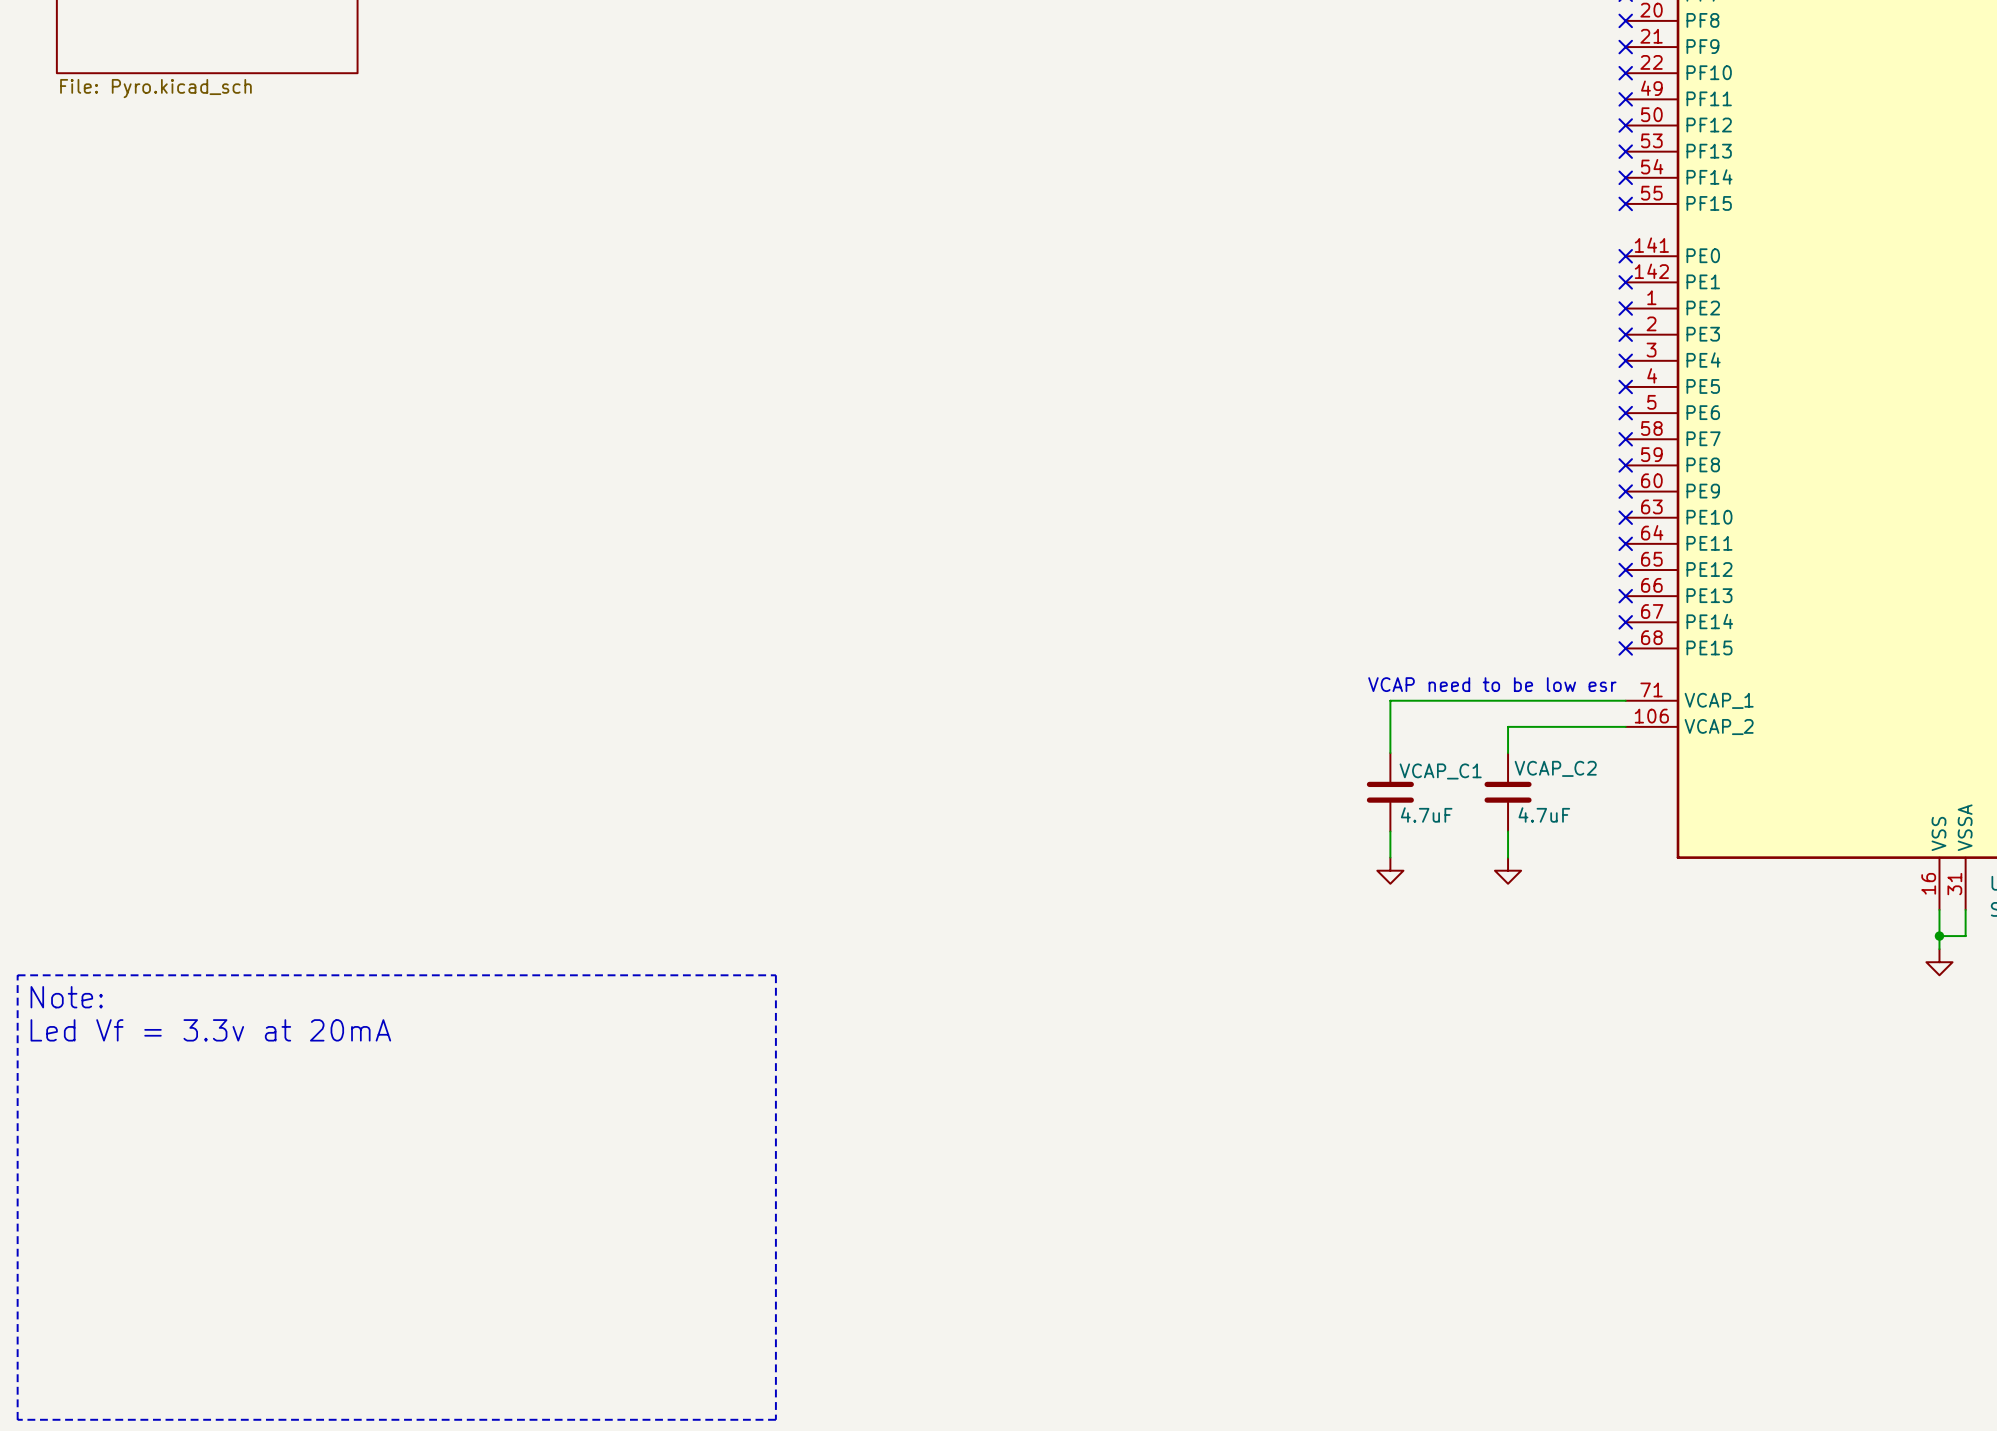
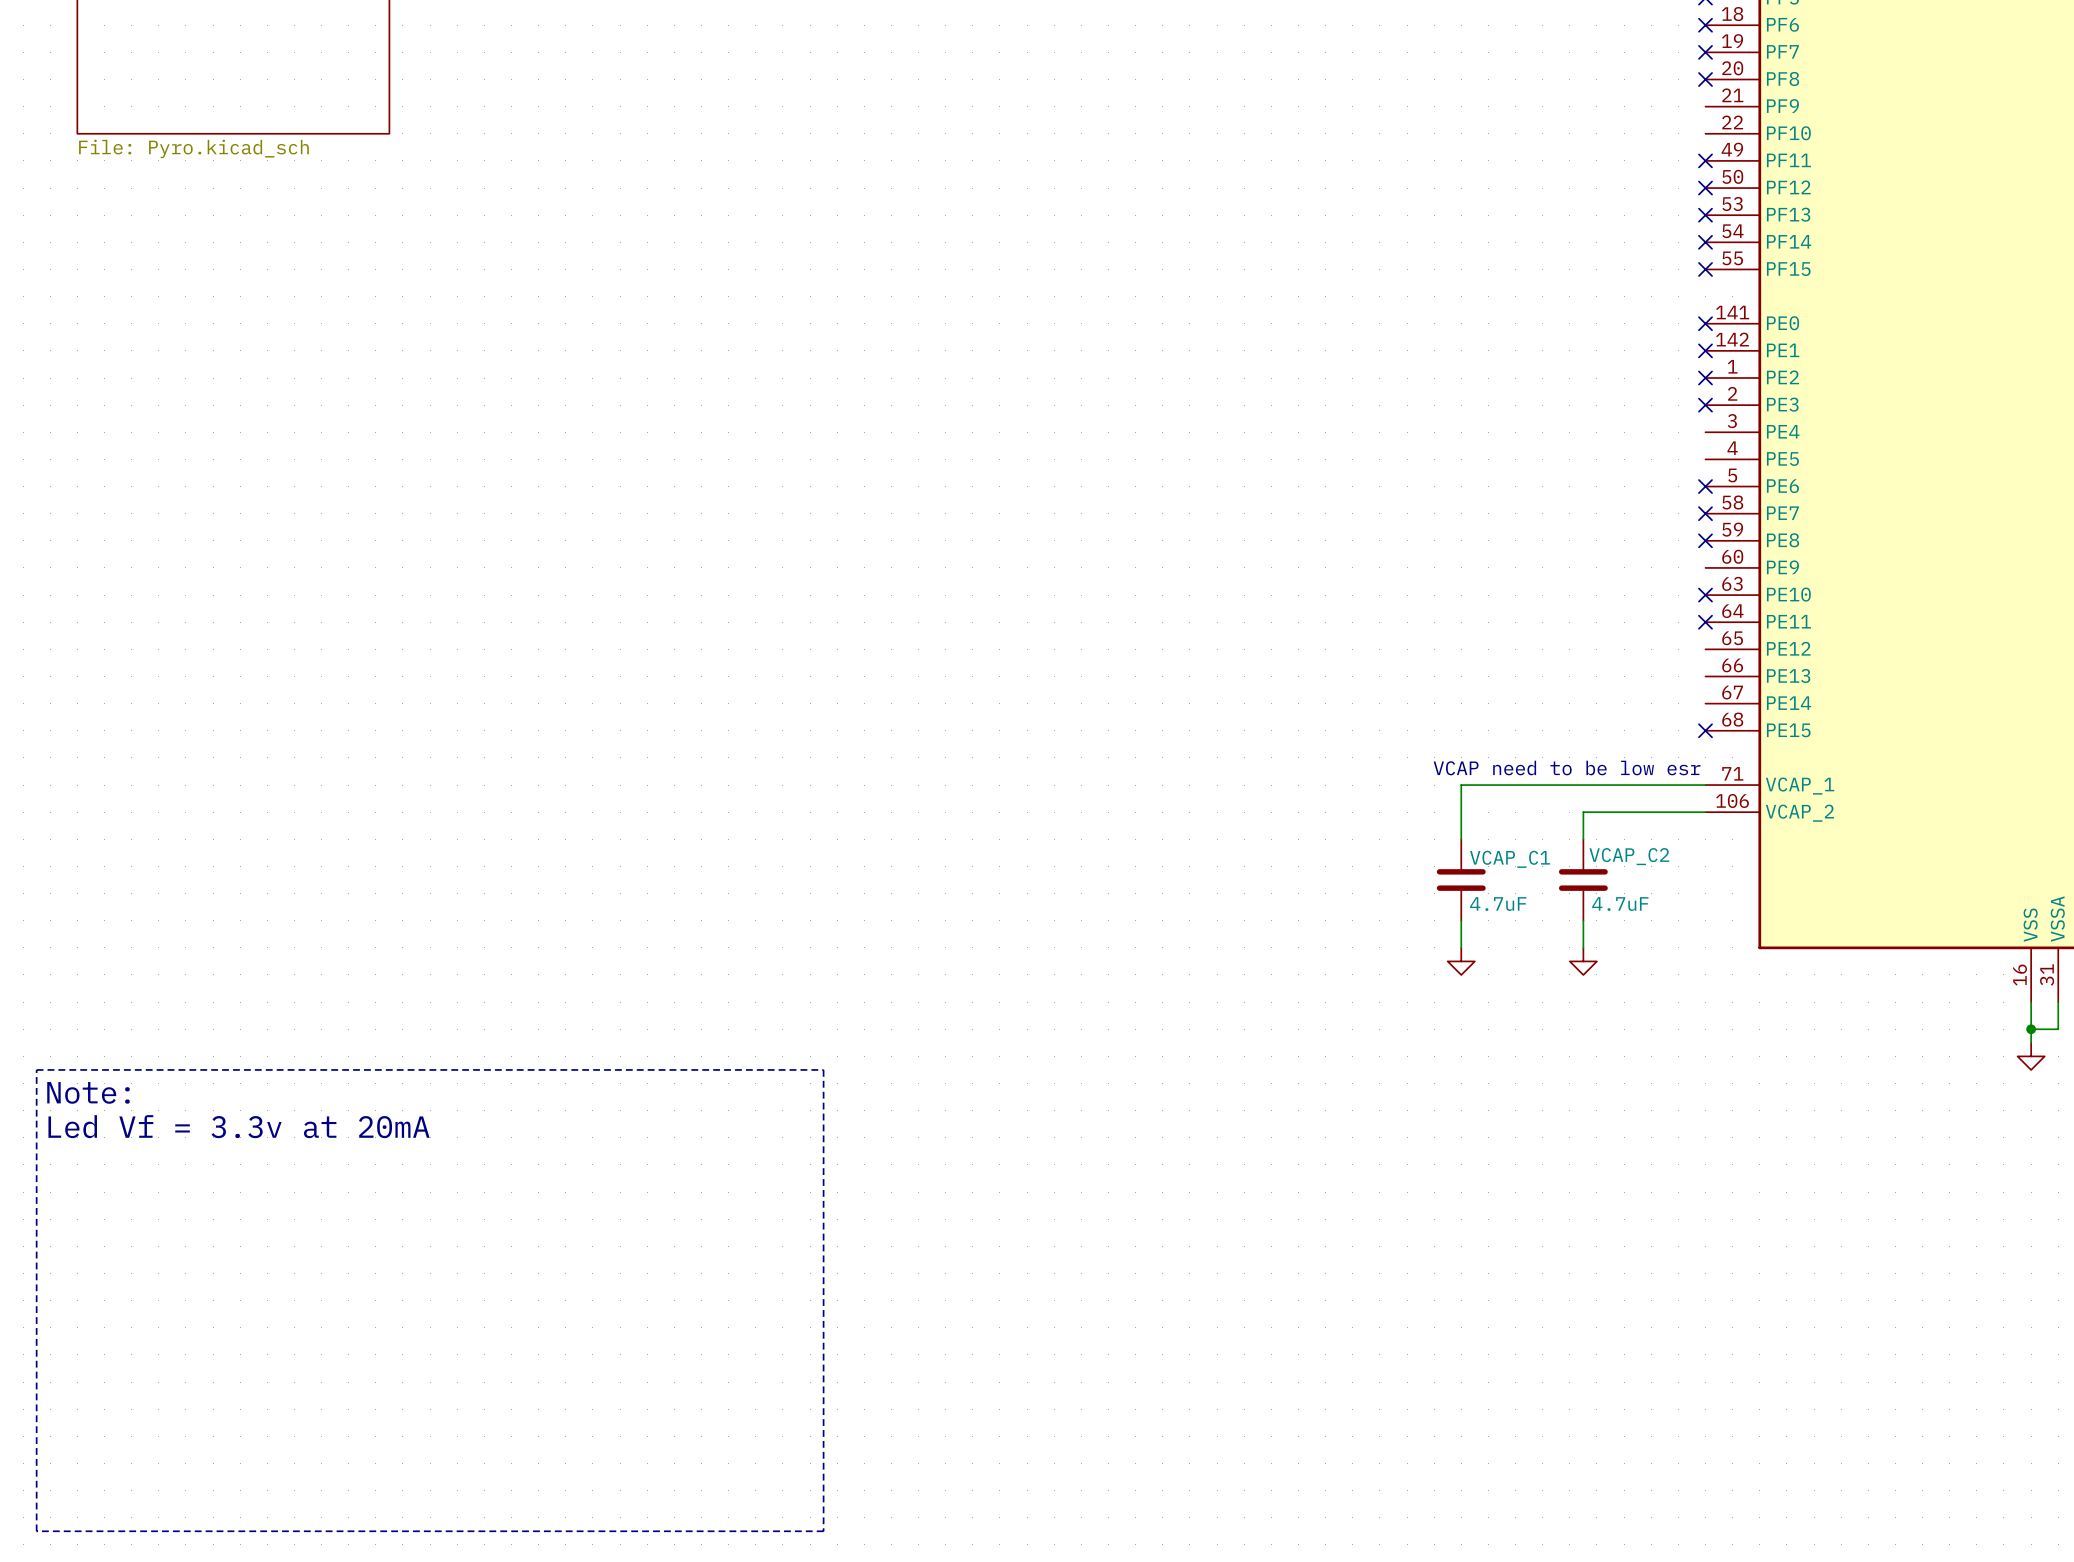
no-connect mark: (1625, 47) -> none
no-connect mark: (1625, 73) -> none
no-connect mark: (1625, 360) -> none
no-connect mark: (1625, 386) -> none
no-connect mark: (1625, 491) -> none
no-connect mark: (1625, 570) -> none
no-connect mark: (1625, 596) -> none
no-connect mark: (1625, 622) -> none

